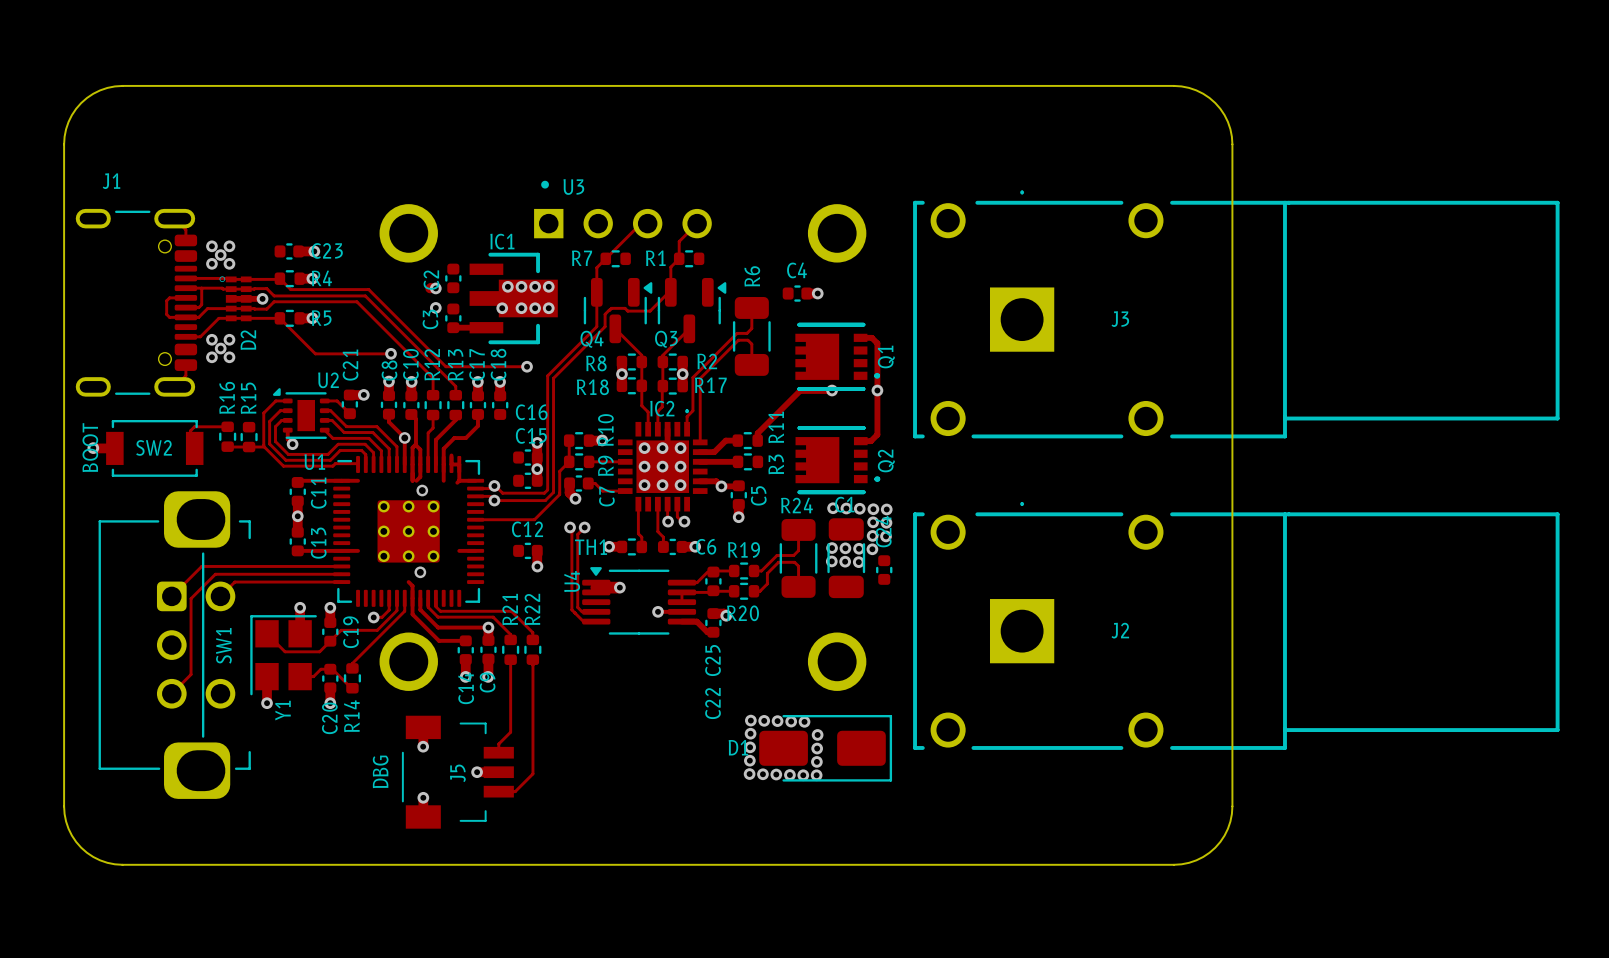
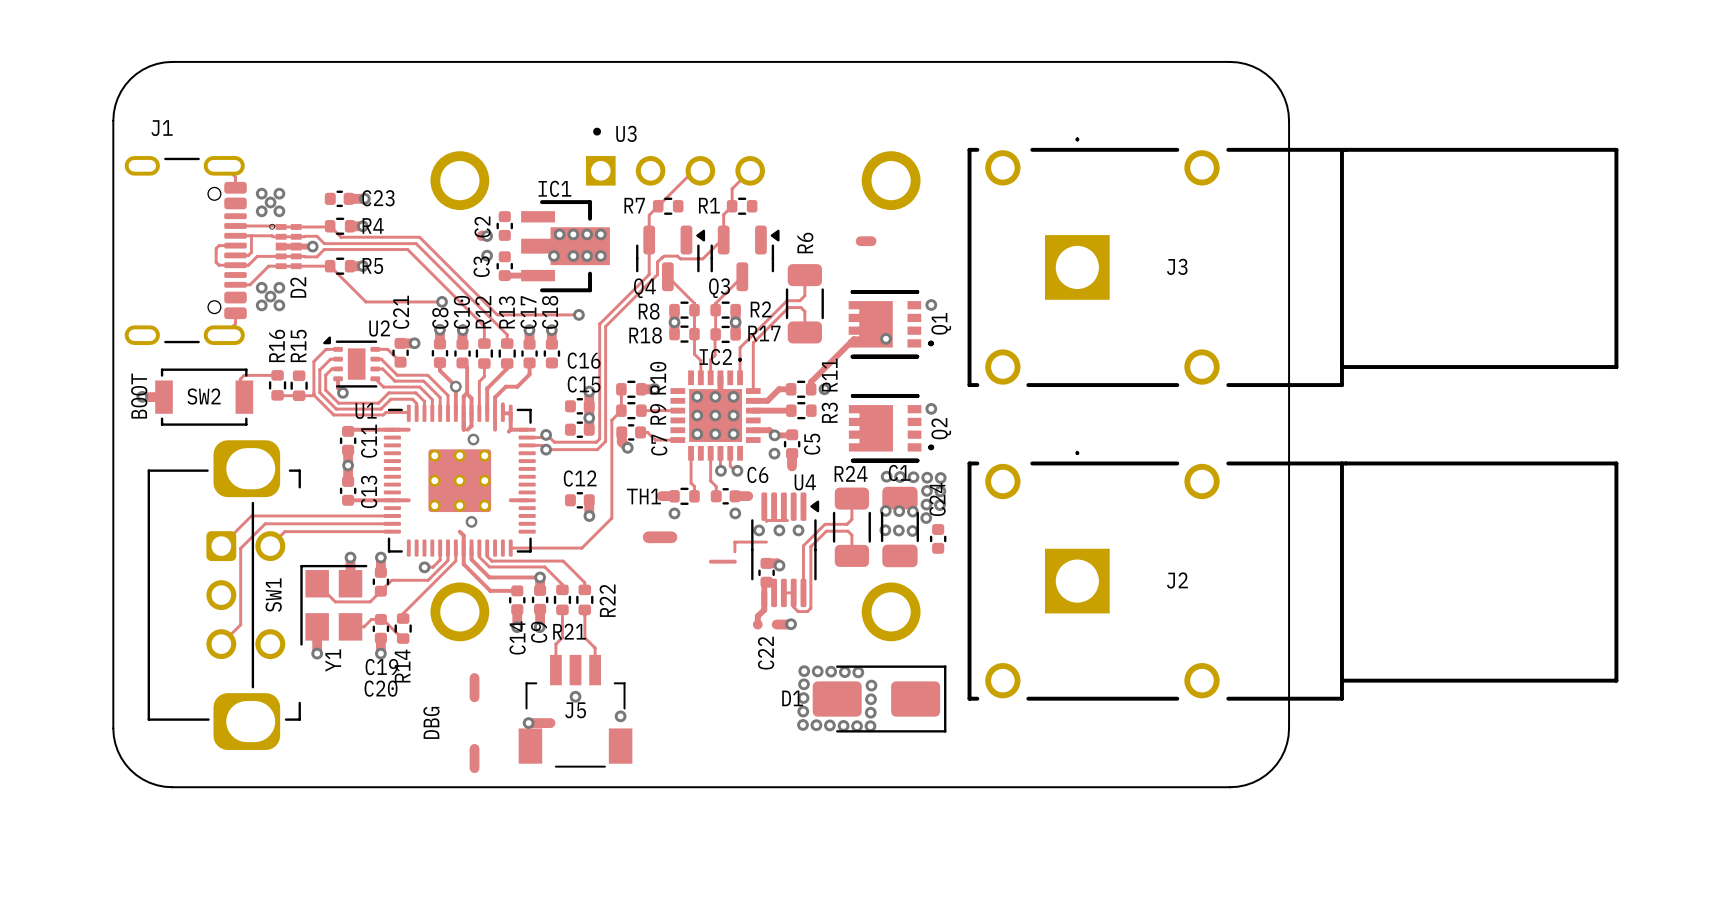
board edge: (1232, 173) (1231, 136) (1224, 115) (1215, 103) (1203, 93) (1189, 87) (1174, 85) (122, 85) (100, 90) (81, 103) (68, 121) (64, 144) (64, 806) (66, 821) (71, 835) (81, 847) (93, 856) (107, 862) (122, 864) (1181, 864) (1203, 856) (1215, 847) (1224, 835) (1231, 814) (1232, 777) -> (1289, 120) (1284, 98) (1271, 79) (1252, 66) (1230, 61) (172, 61) (149, 66) (130, 79) (117, 98) (113, 120) (113, 728) (115, 743) (121, 757) (130, 770) (142, 779) (156, 785) (172, 787) (1230, 787) (1252, 782) (1271, 770) (1284, 750) (1289, 728)
C4: (797, 293) -> none
via: (817, 293) -> none
track: (751, 318) (751, 328) (746, 333) (737, 333) (692, 377) (692, 410) (687, 416) -> (804, 285) (804, 295) (799, 300) (787, 300) (740, 347) (740, 365)
R6 position: (751, 336) -> (804, 303)
track: (860, 337) (871, 337) (877, 343) (877, 434) (870, 441) (860, 441) -> none
track: (751, 354) (751, 344) (747, 340) (738, 340) (700, 378) -> none
Q1 position: (837, 356) -> (891, 324)
track: (700, 378) (700, 394) -> (804, 321) (804, 311) (800, 307) (788, 307) (753, 342)
via position: (877, 390) -> (931, 305)
via: none -> (824, 389)
Q2 position: (837, 460) -> (891, 428)
via: none -> (931, 408)
track: (559, 494) (534, 519) (475, 519) -> (611, 443) (611, 518) (581, 548) (510, 548)
via: (833, 508) -> none
via: (846, 508) -> none
via: (859, 508) -> none
via: (873, 509) -> none
via: (886, 509) -> none
via position: (738, 517) -> (774, 453)
via: (873, 522) -> none
via: (886, 522) -> none
track: (570, 527) (573, 530) (571, 609) (583, 621) (596, 621) -> none
via: (570, 527) -> none
via: (584, 527) -> none
via: none -> (886, 476)
via: none -> (900, 476)
via: none -> (913, 477)
via: none -> (927, 477)
via: none -> (940, 477)
track: (586, 529) (584, 527) (577, 534) (577, 607) (582, 611) (596, 611) -> none
via: (872, 535) -> none
via: (886, 536) -> none
track: (798, 540) (798, 550) (793, 555) (776, 555) (761, 570) (754, 570) -> none
via: none -> (926, 490)
via: none -> (940, 491)
via: (609, 546) -> none
via: (695, 546) -> none
C6 name position: C6 (706, 546) -> C6 (757, 474)
via: (832, 548) -> none
via: (845, 548) -> none
via: (859, 548) -> none
via: (872, 549) -> none
via: none -> (926, 504)
via: none -> (939, 505)
R24 position: (798, 558) -> (851, 527)
C1 position: (846, 558) -> (899, 527)
track: none -> (851, 509) (851, 519) (847, 524) (824, 524) (803, 545) (803, 592)
via: none -> (674, 513)
via: none -> (735, 513)
via: none -> (926, 518)
R19: (744, 570) -> none
C24 position: (884, 570) -> (938, 538)
track: (707, 572) (697, 582) (681, 582) -> none
track: (798, 576) (798, 566) (794, 562) (778, 562) (767, 573) (767, 583) (759, 591) (754, 591) -> none
via: none -> (759, 530)
via: none -> (779, 530)
via: none -> (798, 530)
via: none -> (885, 530)
via: none -> (898, 530)
C25: (713, 581) -> none
via: none -> (912, 530)
via: (619, 587) -> none
track: (713, 590) (734, 591) -> none
R20: (744, 591) -> none
track: none -> (851, 545) (851, 535) (847, 531) (826, 531) (810, 546) (810, 608) (807, 611) (798, 611) (793, 607) (793, 592) (783, 592)
U4 rotation: 0° (639, 600) -> 90° clockwise (785, 549)
U4 position: (639, 600) -> (785, 549)
R21 name rotation: 0° (510, 609) -> 90° clockwise (569, 631)
R21 name position: R21 (510, 609) -> R21 (569, 631)
R22 name position: R22 (532, 609) -> R22 (607, 600)
via: (658, 611) -> none
track: (681, 621) (696, 621) (707, 632) (713, 632) -> none
C19 name rotation: 0° (350, 632) -> 90° clockwise (381, 667)
C19 name position: C19 (350, 632) -> C19 (381, 667)
track: none -> (764, 592) (764, 609) (757, 616) (757, 624)
track: none -> (791, 624) (776, 624)
via: none -> (791, 624)
track: (510, 687) (510, 732) (498, 744) (498, 752) -> (562, 637) (555, 644) (555, 670)
track: (532, 687) (532, 773) (515, 791) (498, 791) -> (584, 637) (595, 648) (595, 670)
C20 name rotation: 0° (329, 718) -> 90° clockwise (381, 688)
via: (423, 746) -> none
via: none -> (575, 696)
via: none -> (620, 716)
J5 rotation: 0° (457, 772) -> 90° counterclockwise (575, 711)
via: (423, 797) -> none

